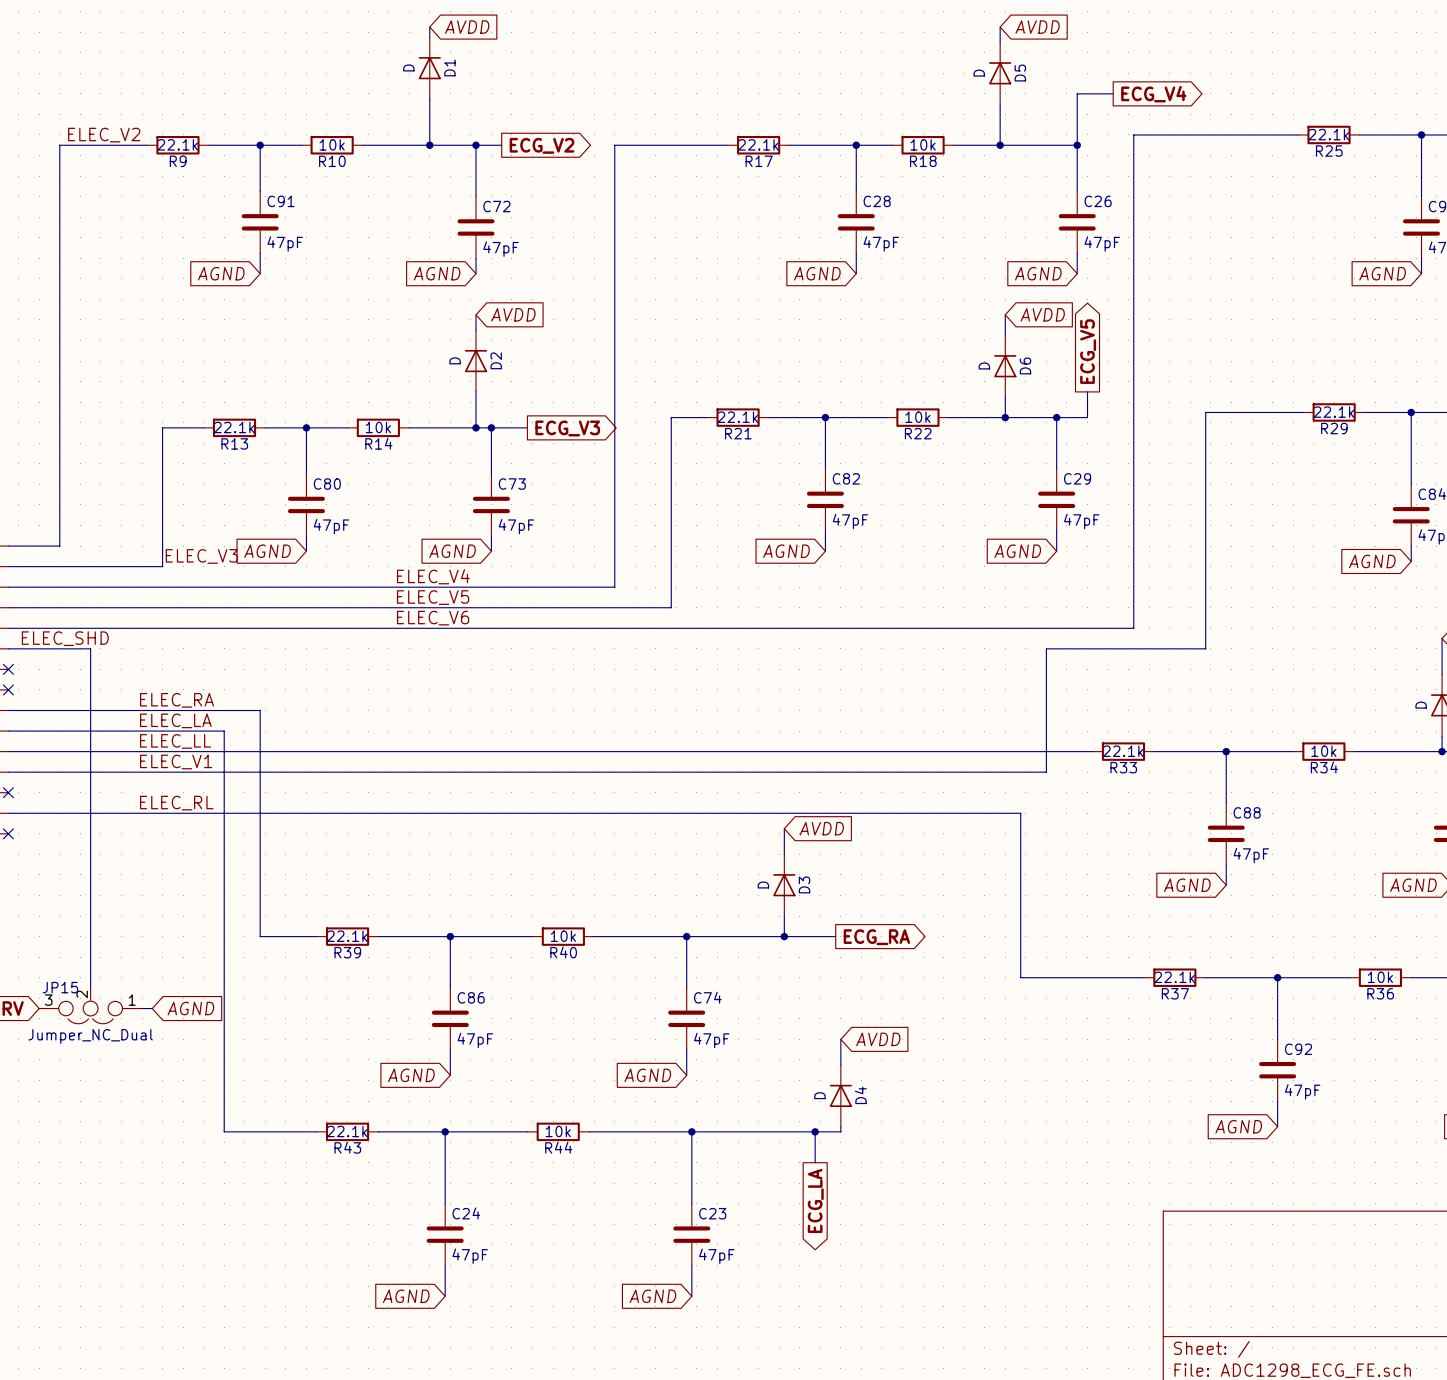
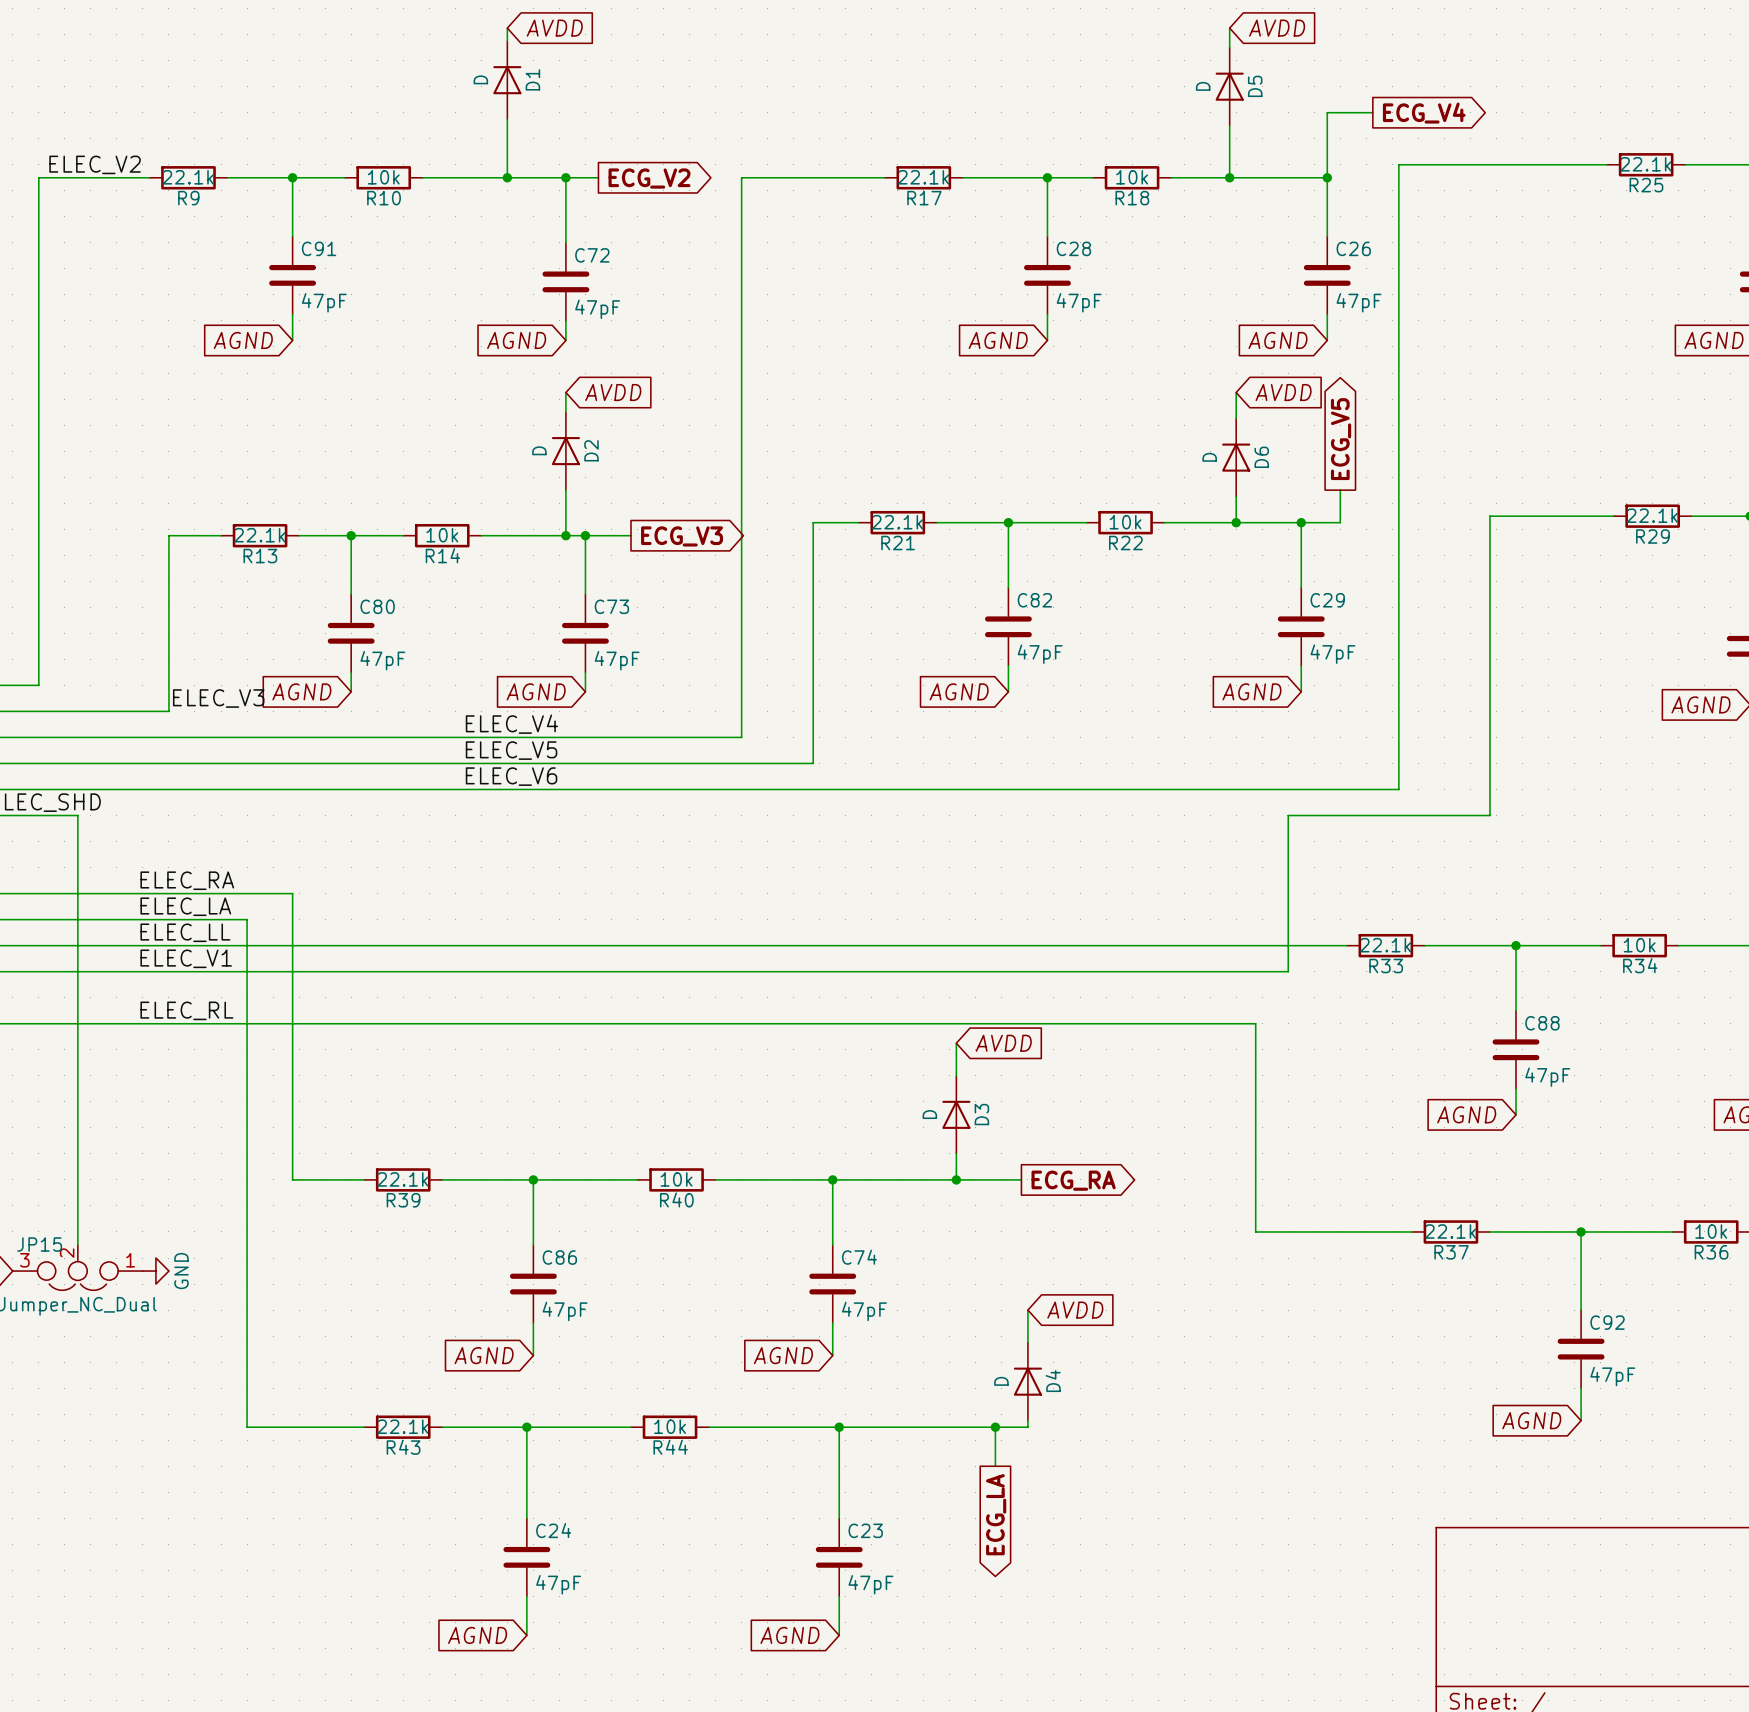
power symbol: none -> GND (155, 1271)
global label: AGND (190, 1008) -> none

